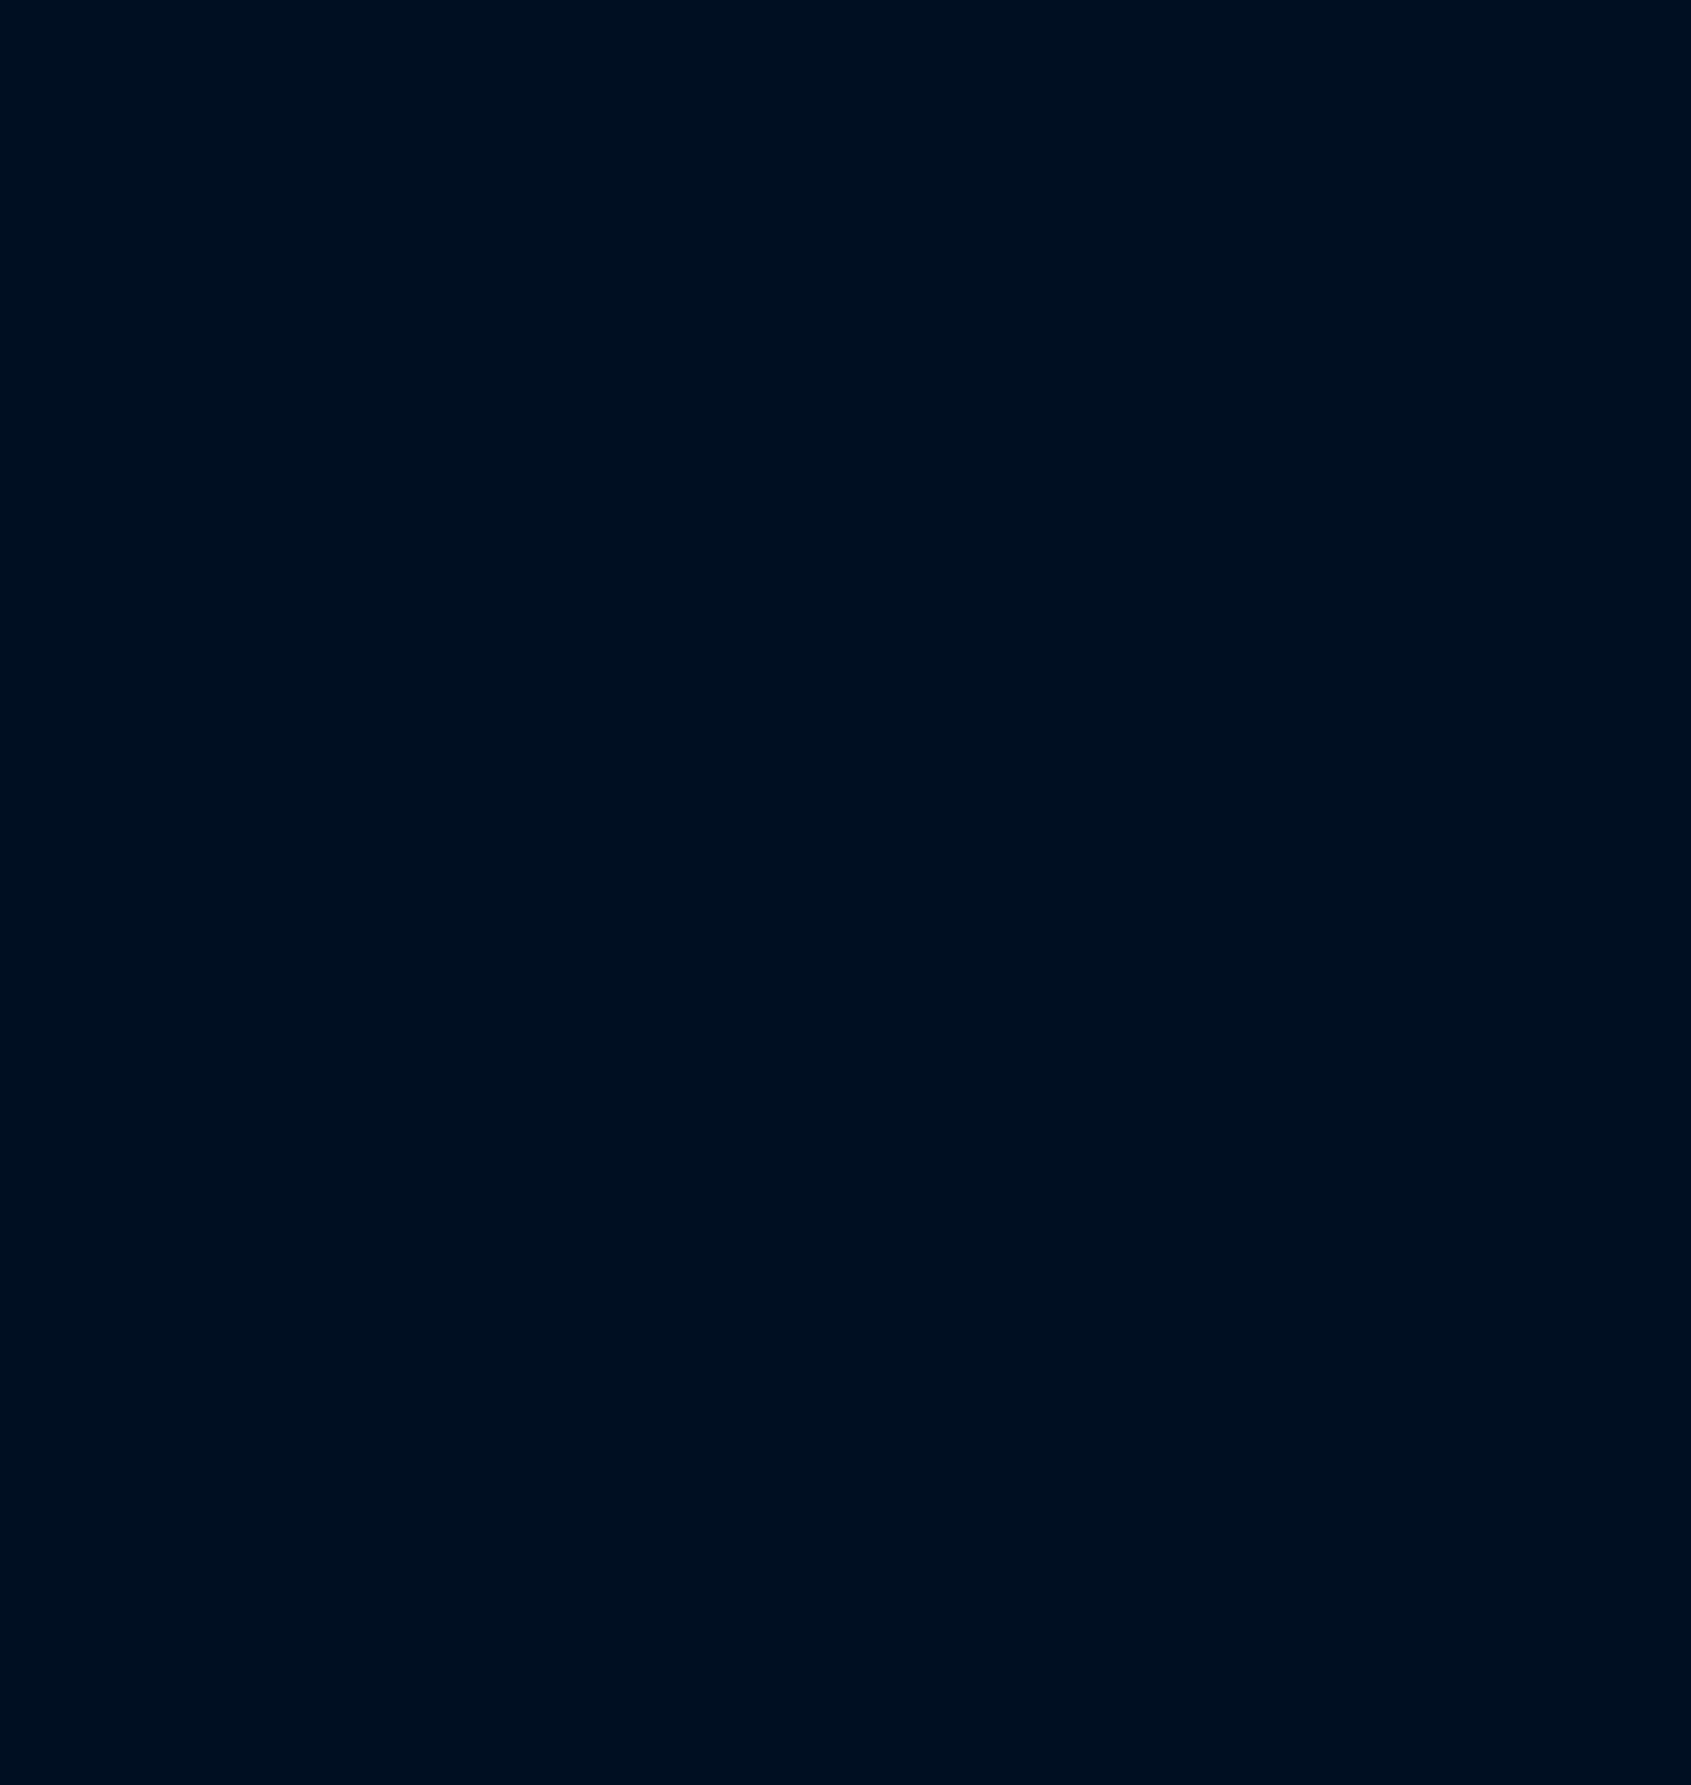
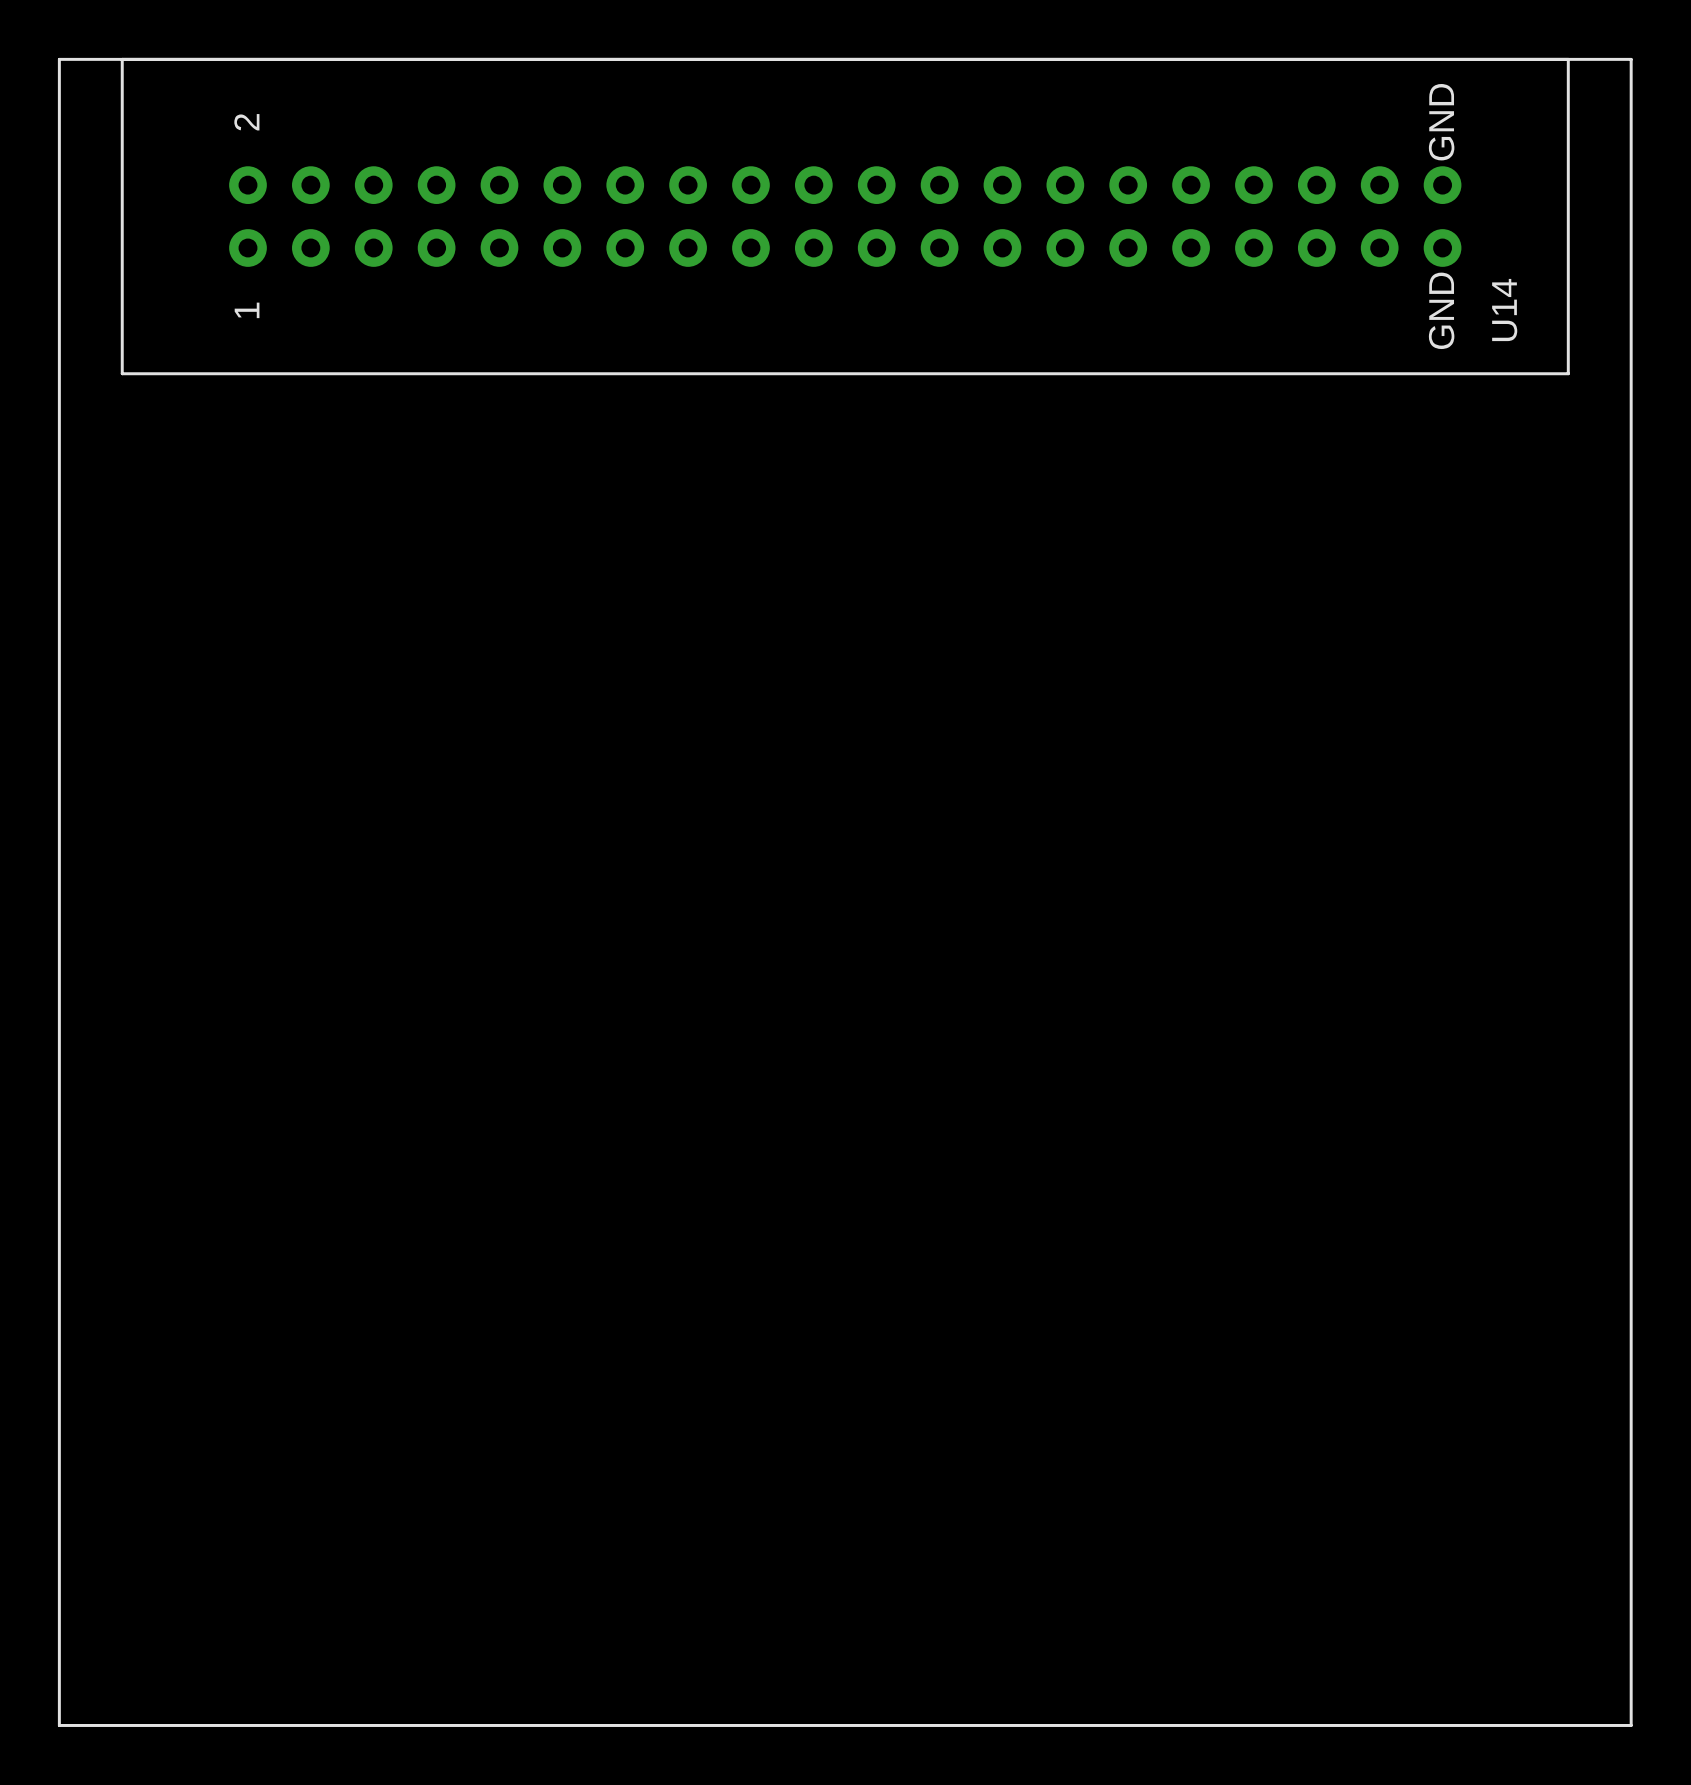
U14: none -> (845, 892)

